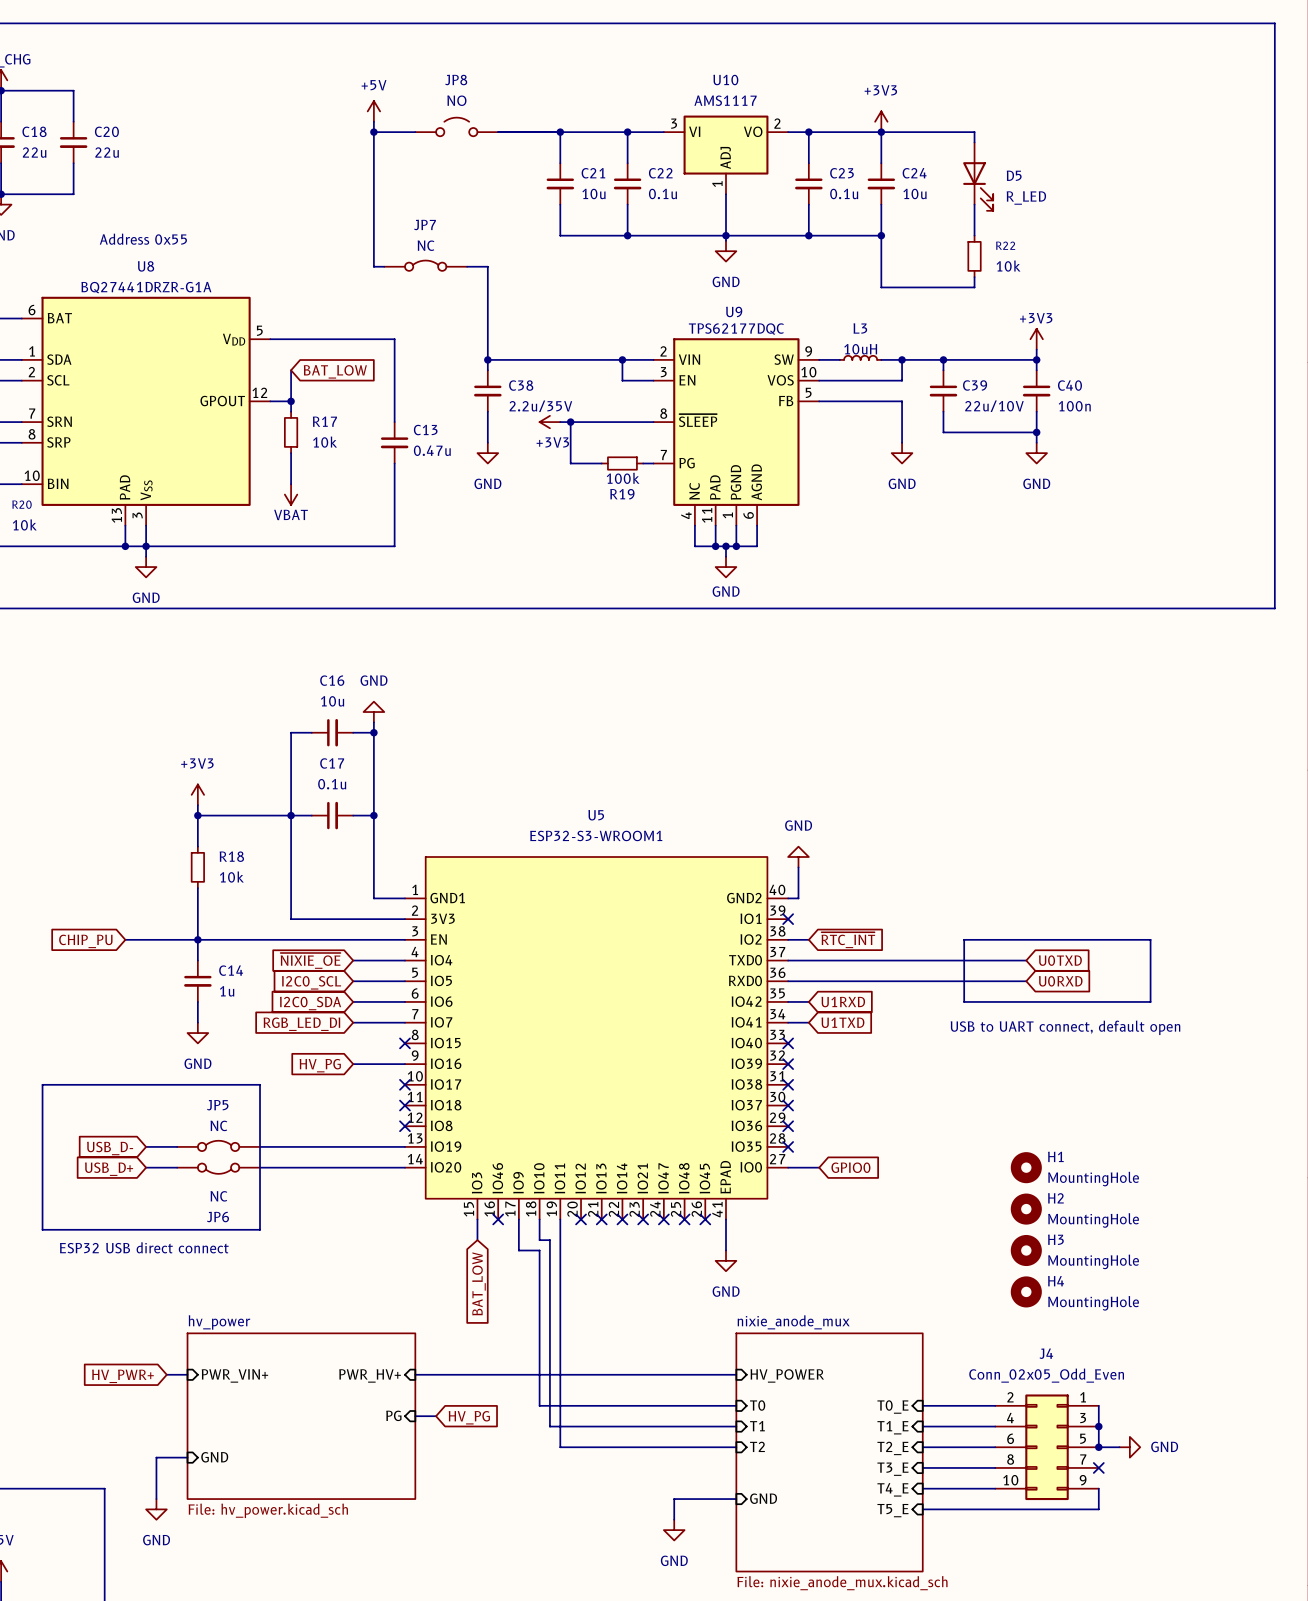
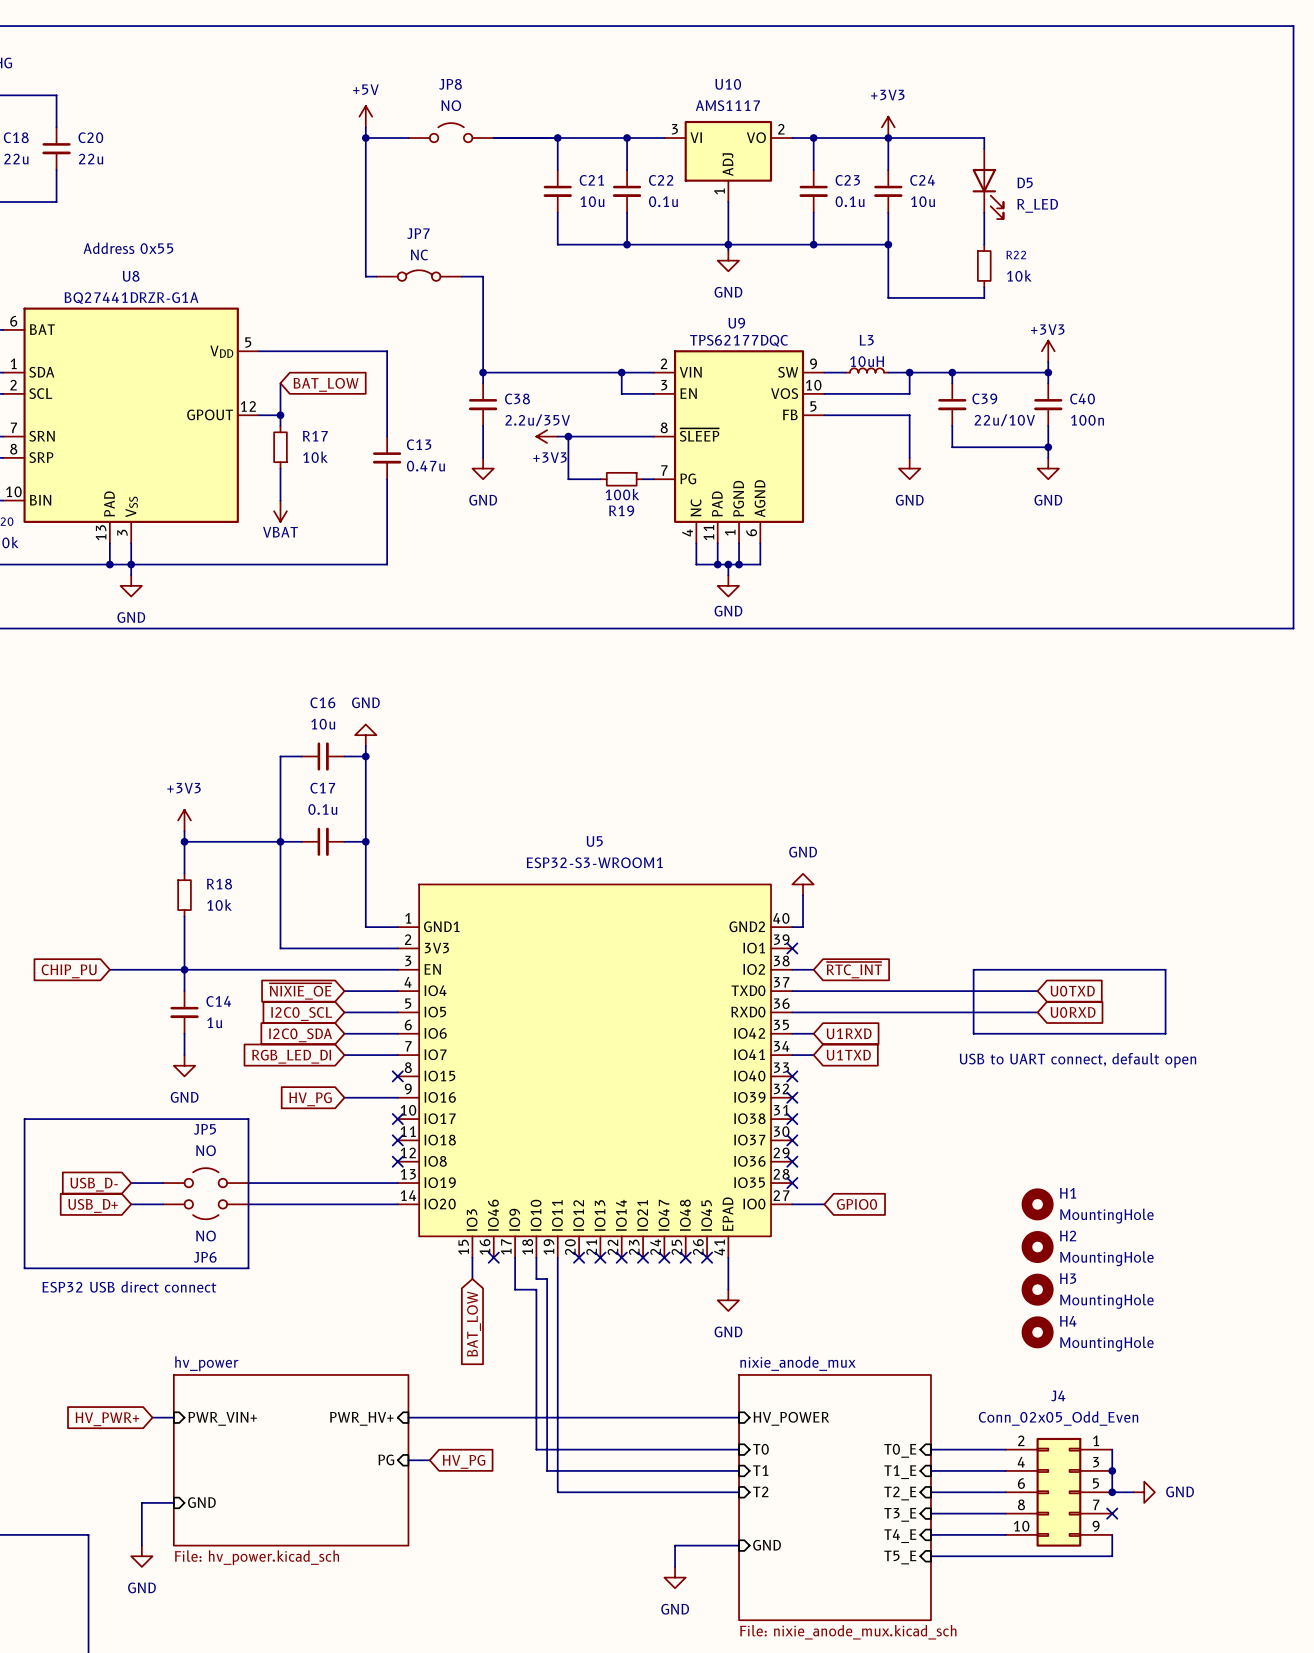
JP5 value: NC (218, 1125) -> NO (206, 1150)
JP5 symbol: [177, 1140, 261, 1152] -> [163, 1168, 249, 1188]
JP6 symbol: [177, 1163, 261, 1174] -> [163, 1200, 249, 1220]
JP6 value: NC (218, 1196) -> NO (206, 1236)

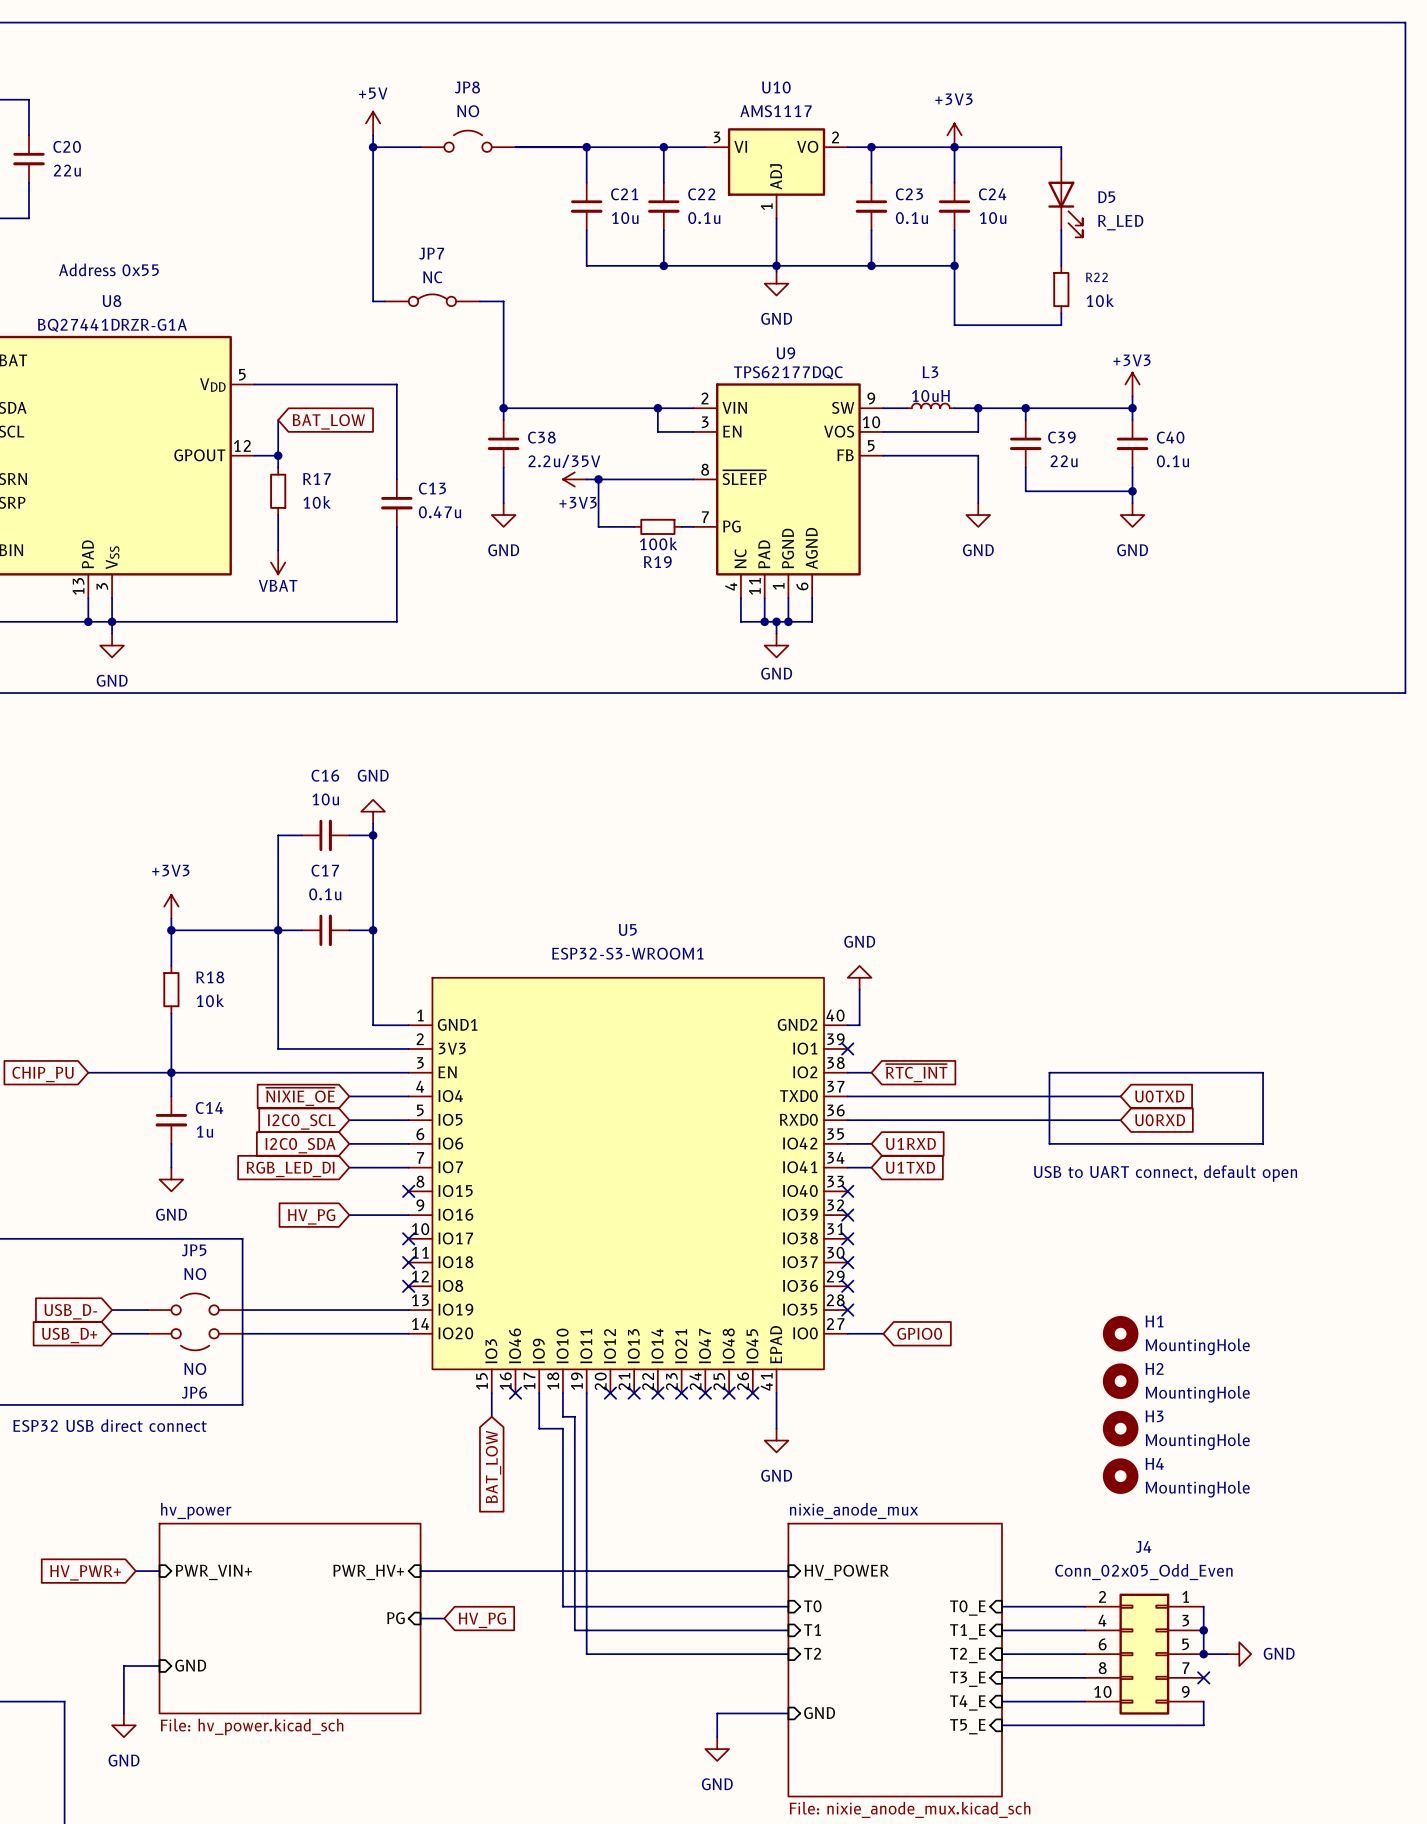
C39 value: 22u/10V (1004, 420) -> 22u (1064, 461)
C40 value: 100n (1087, 420) -> 0.1u (1172, 461)

